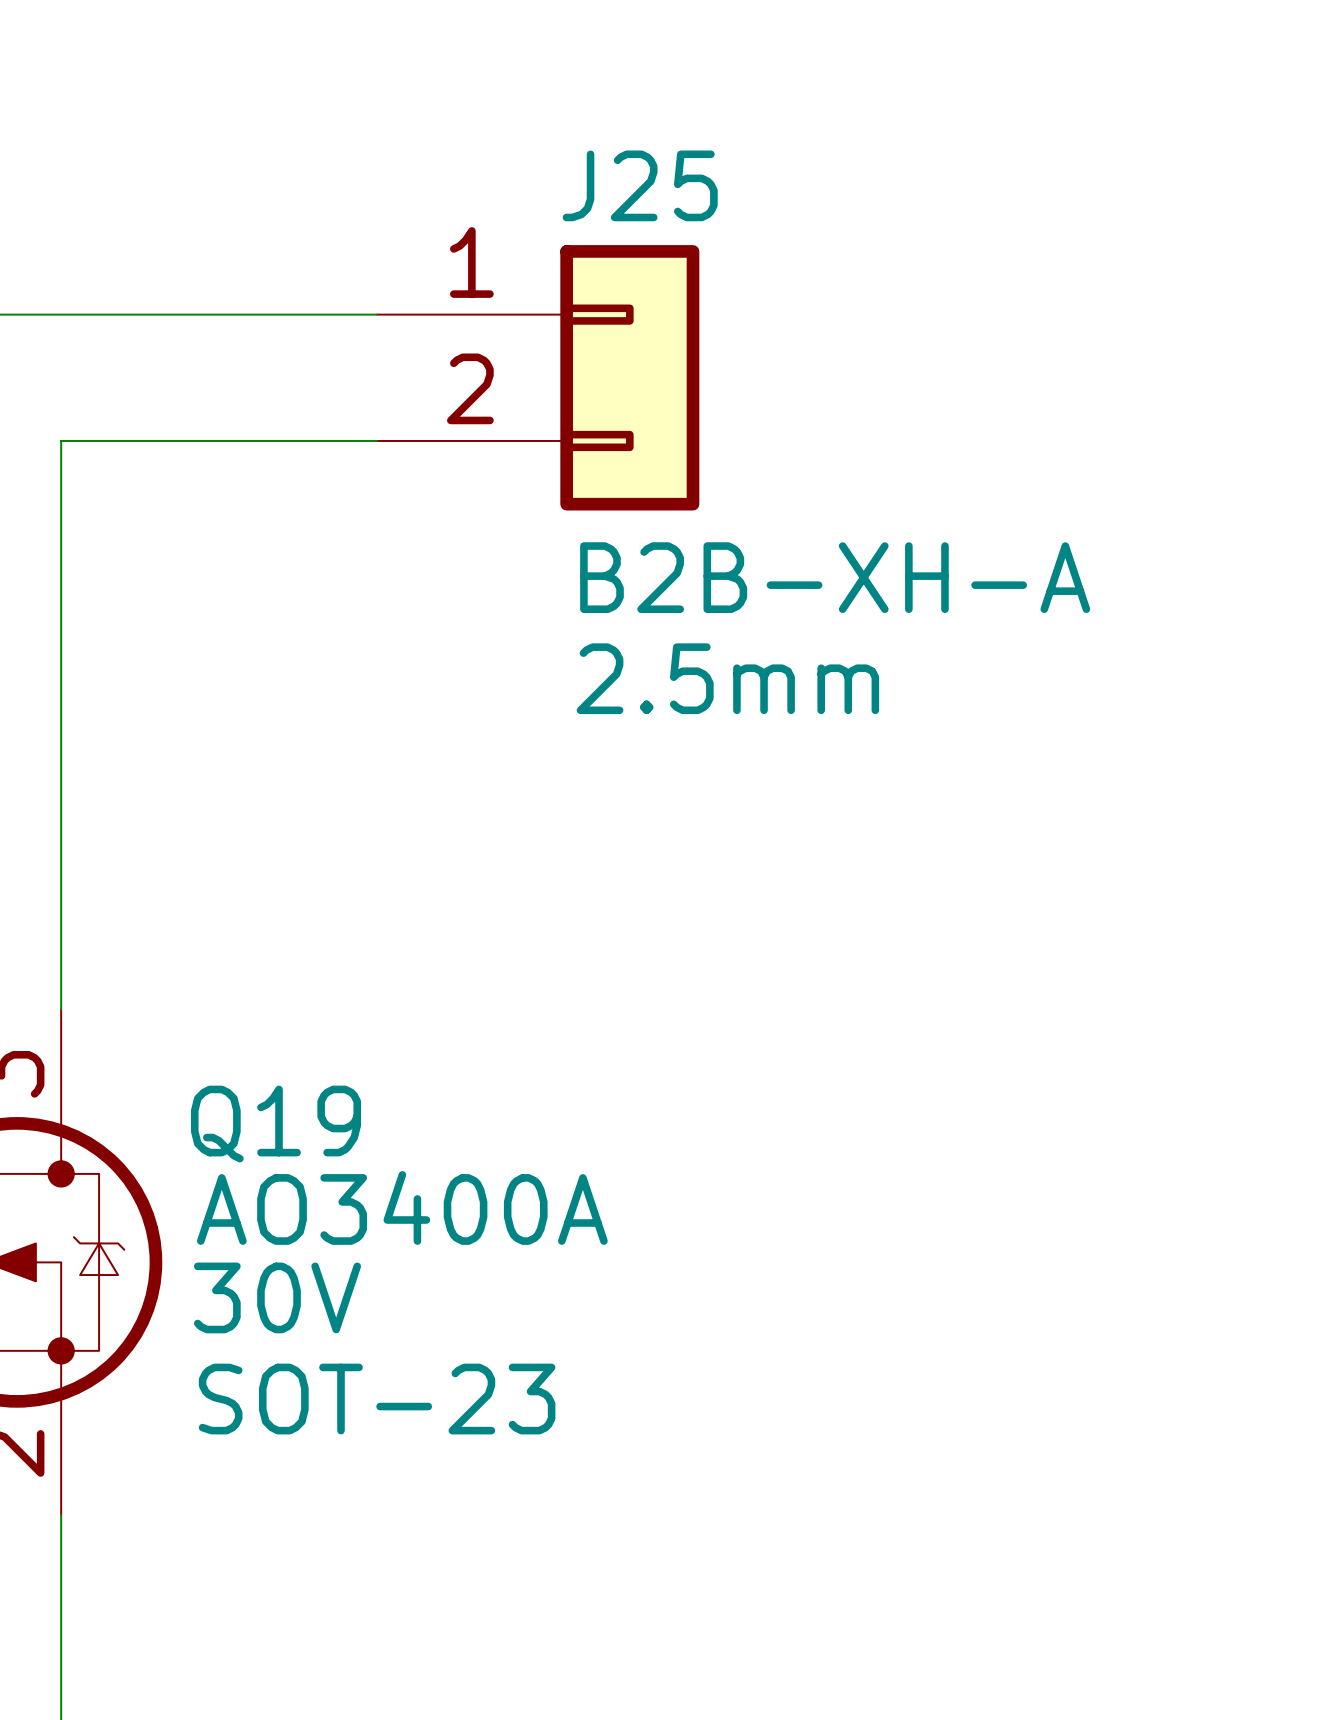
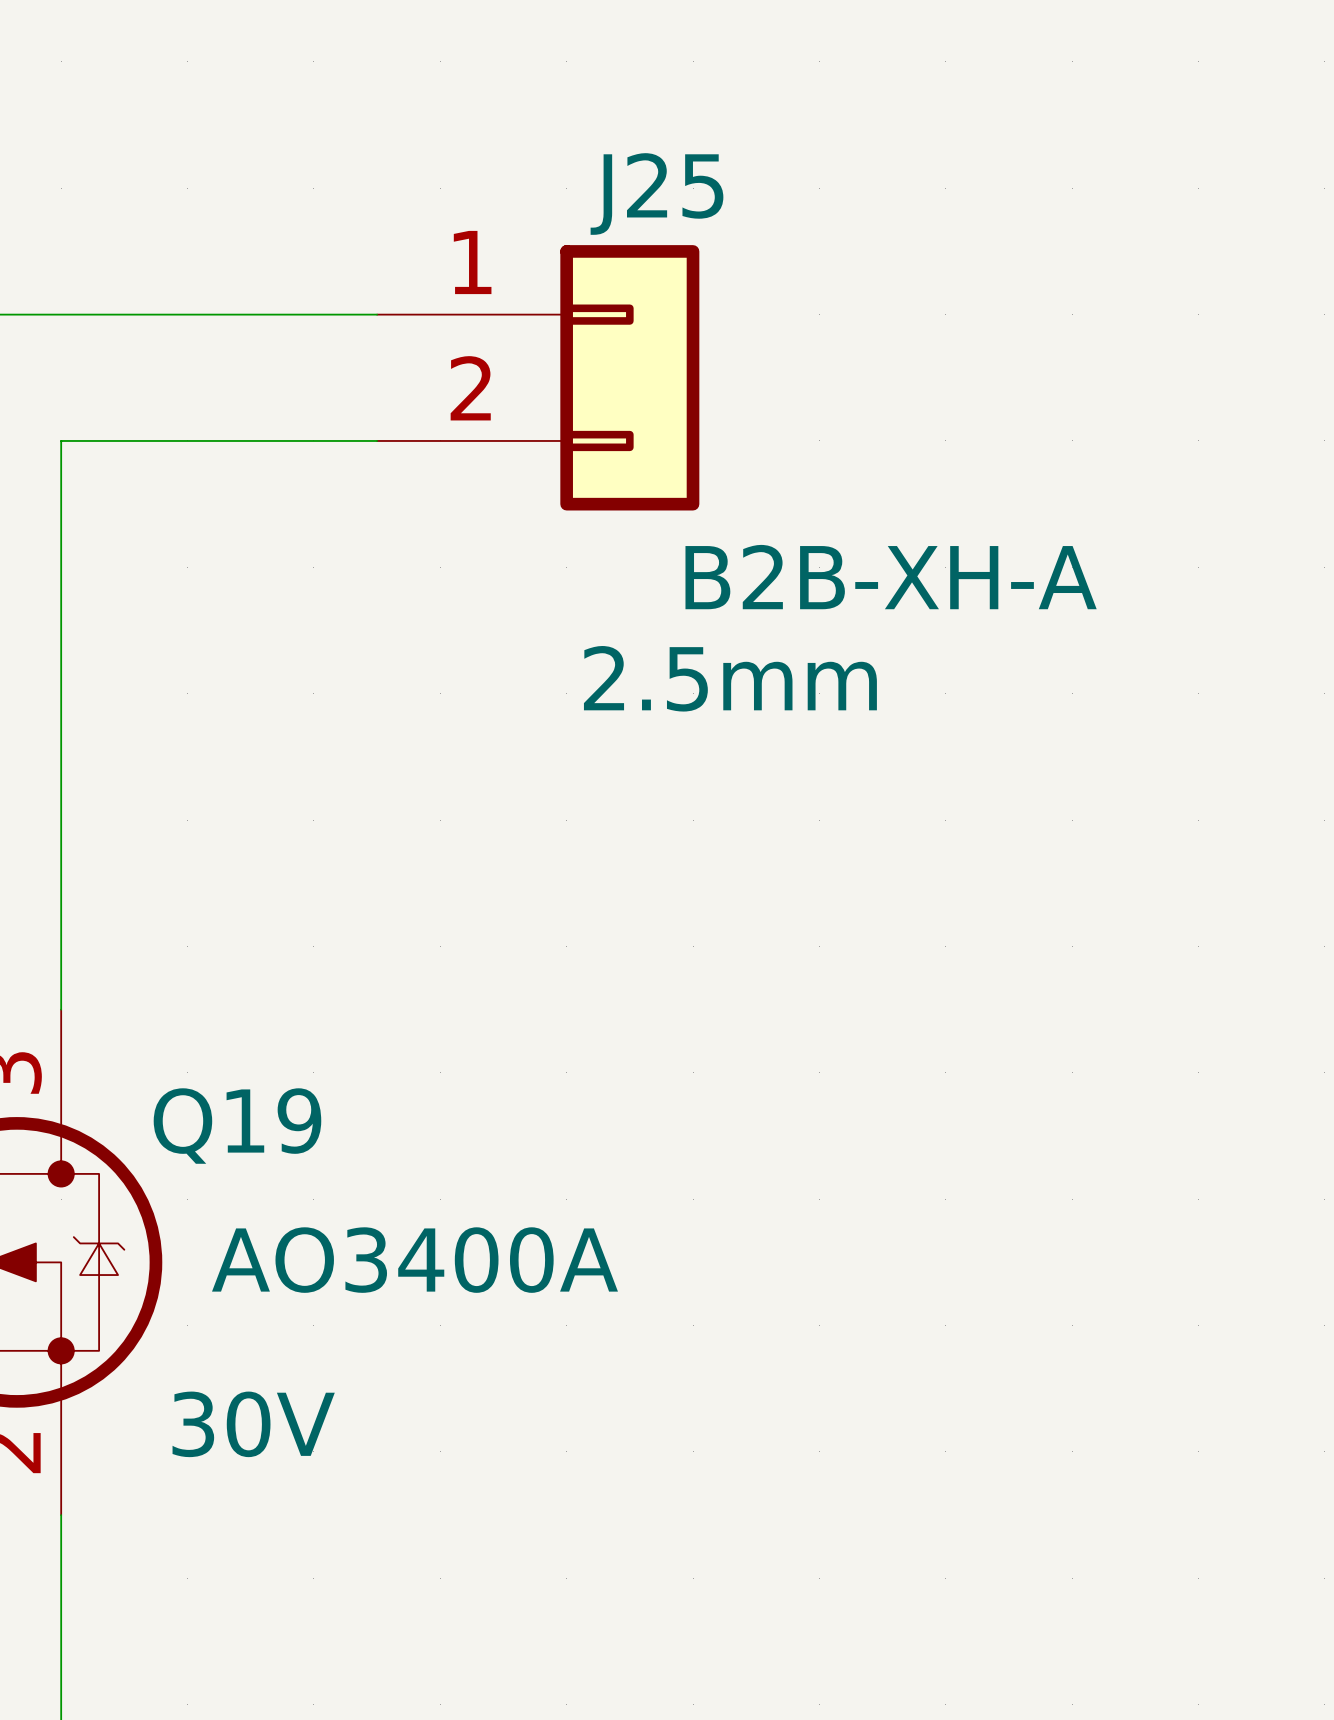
Q19 name position: Q19 (276, 1124) -> Q19 (237, 1126)
Q19 value position: AO3400A (402, 1207) -> AO3400A (414, 1260)
Q19 text position: 30V (277, 1297) -> 30V (253, 1424)
Q19 text: SOT-23 (377, 1399) -> none

